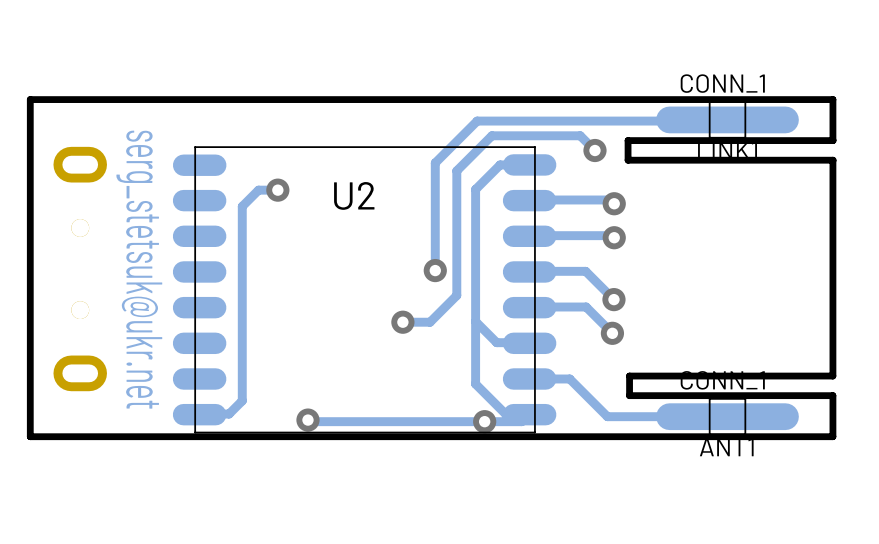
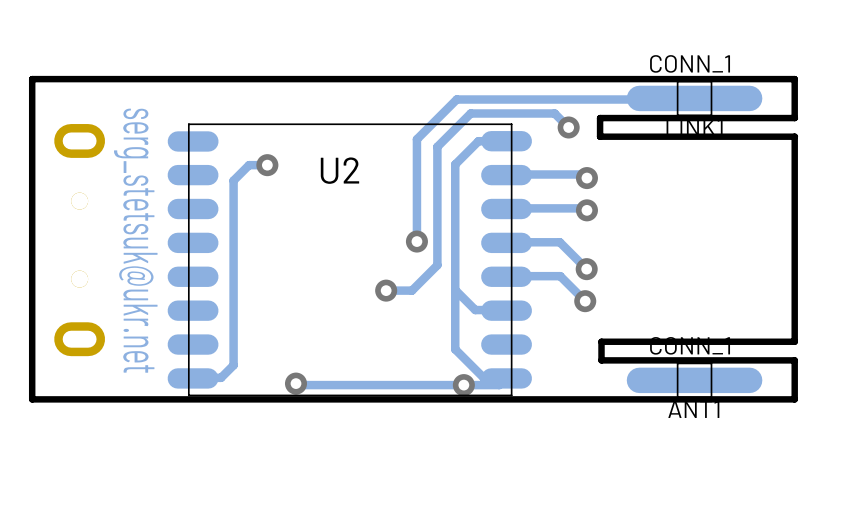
track: (529, 378) (569, 378) (607, 416) (727, 416) -> none

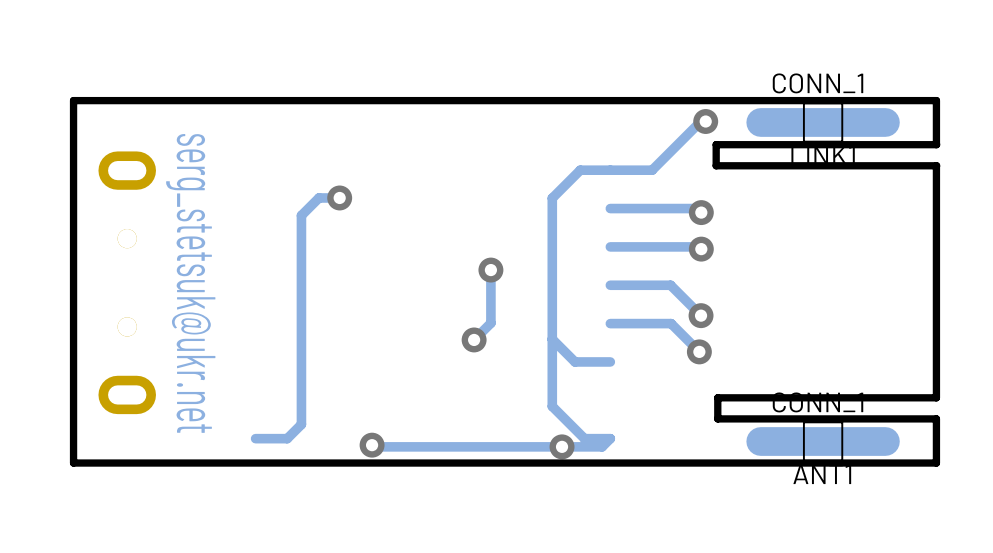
track: (694, 99) (456, 99) (416, 139) (416, 241) -> none
track: (568, 127) (554, 113) (470, 113) (437, 146) (437, 265) (411, 290) (386, 290) -> (490, 270) (490, 323) (474, 339)
via position: (568, 127) -> (705, 121)
track: (506, 141) (478, 141) (455, 165) -> (705, 121) (700, 121) (652, 170) (580, 170) (552, 198)
via position: (416, 241) -> (490, 270)
U2: (349, 259) -> none

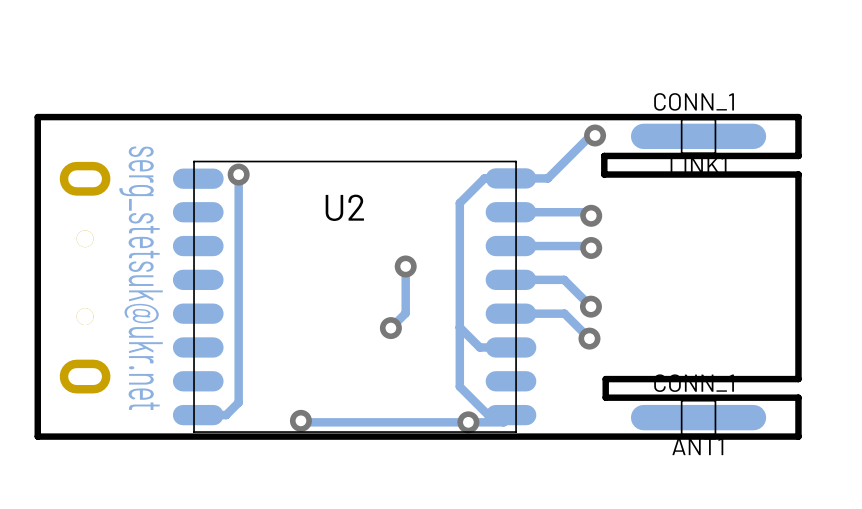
track: (339, 197) (318, 197) (301, 215) -> (238, 174) (238, 218)
via position: (339, 197) -> (238, 174)
U2: none -> (354, 296)

